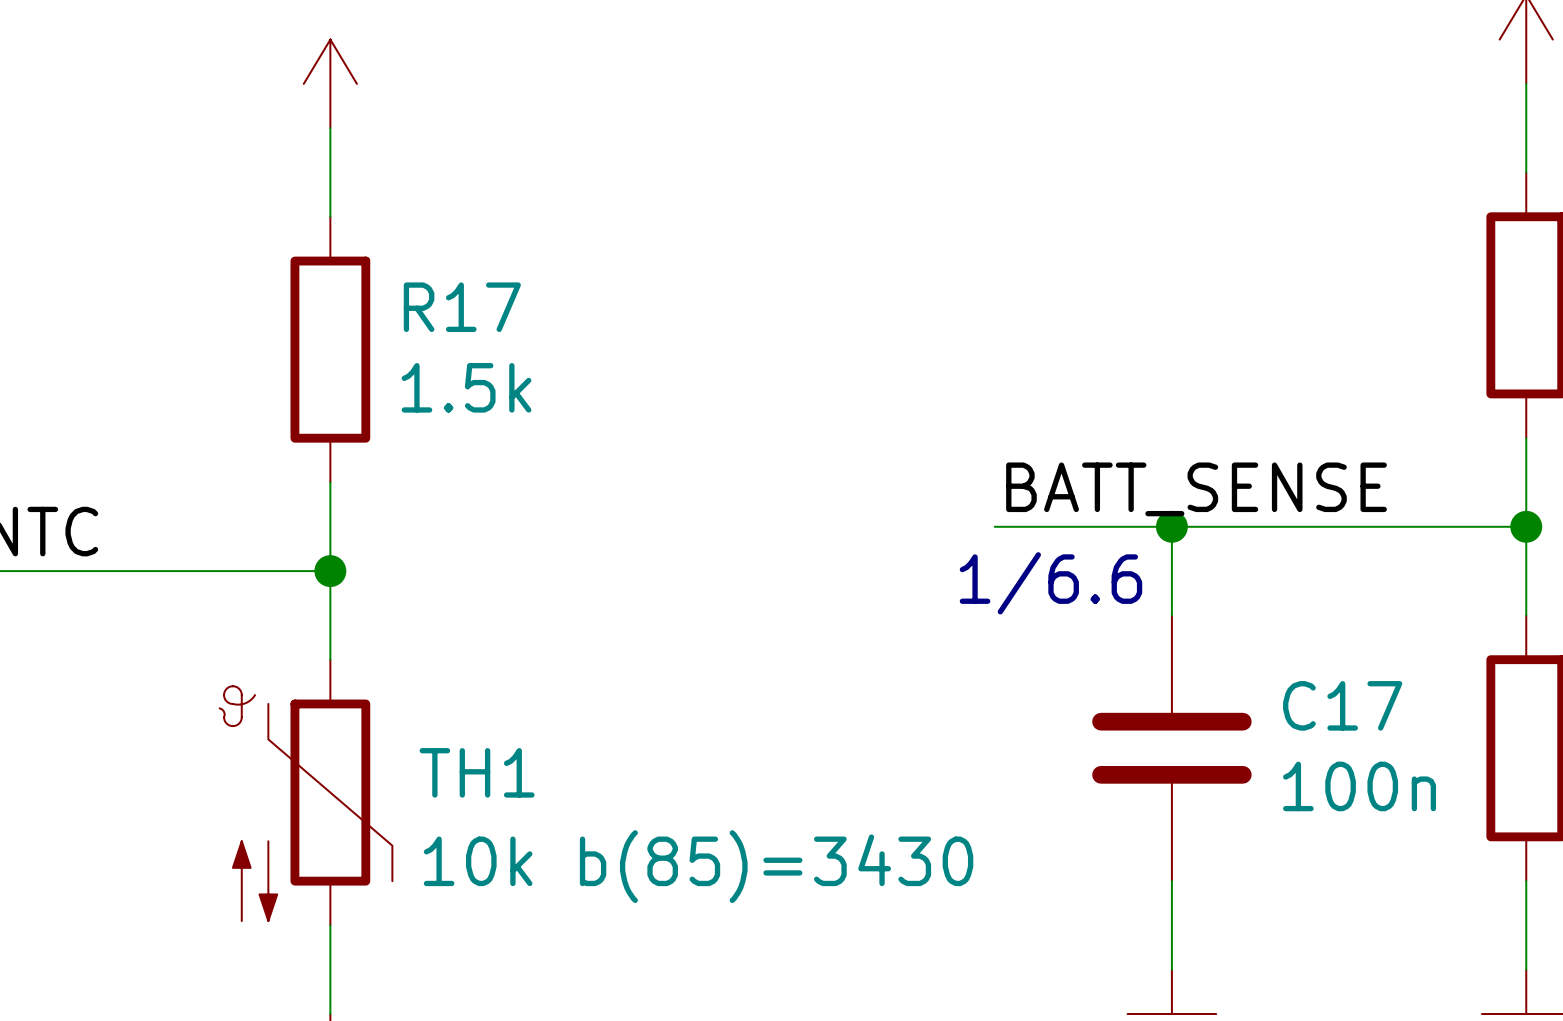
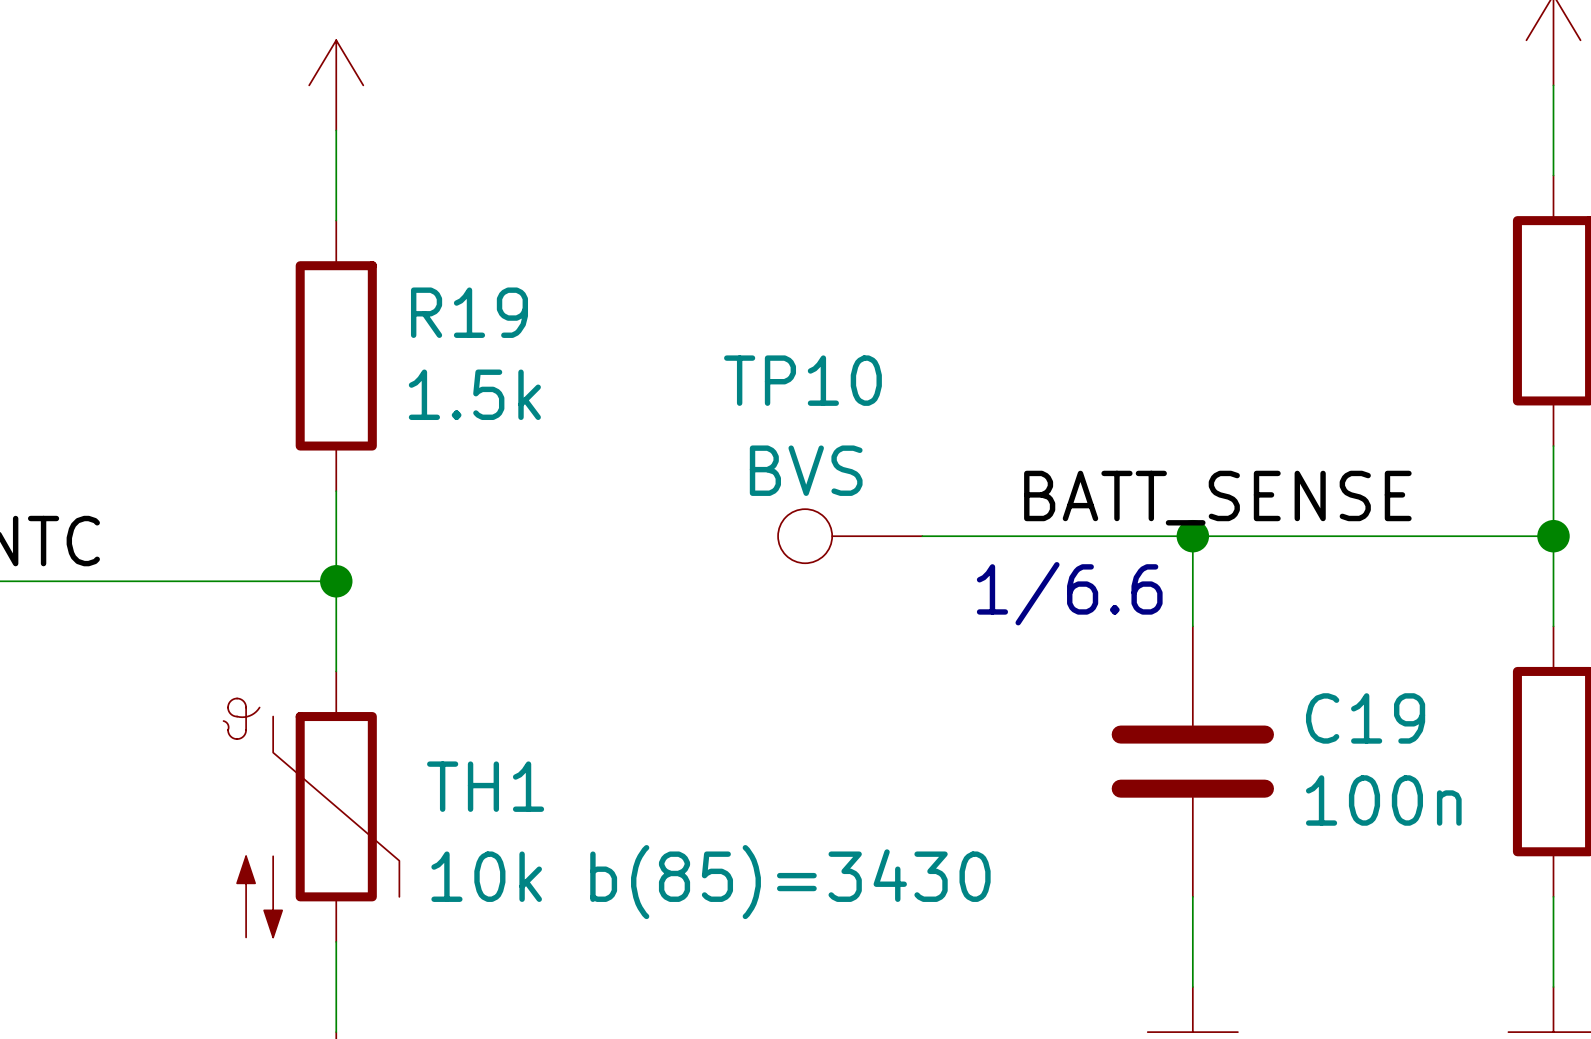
R17 name: R17 (462, 307) -> R19 (469, 312)
TP10: none -> BVS (850, 536)
wire: none -> (922, 536) (1012, 536)
C17 name: C17 (1342, 705) -> C19 (1365, 718)

